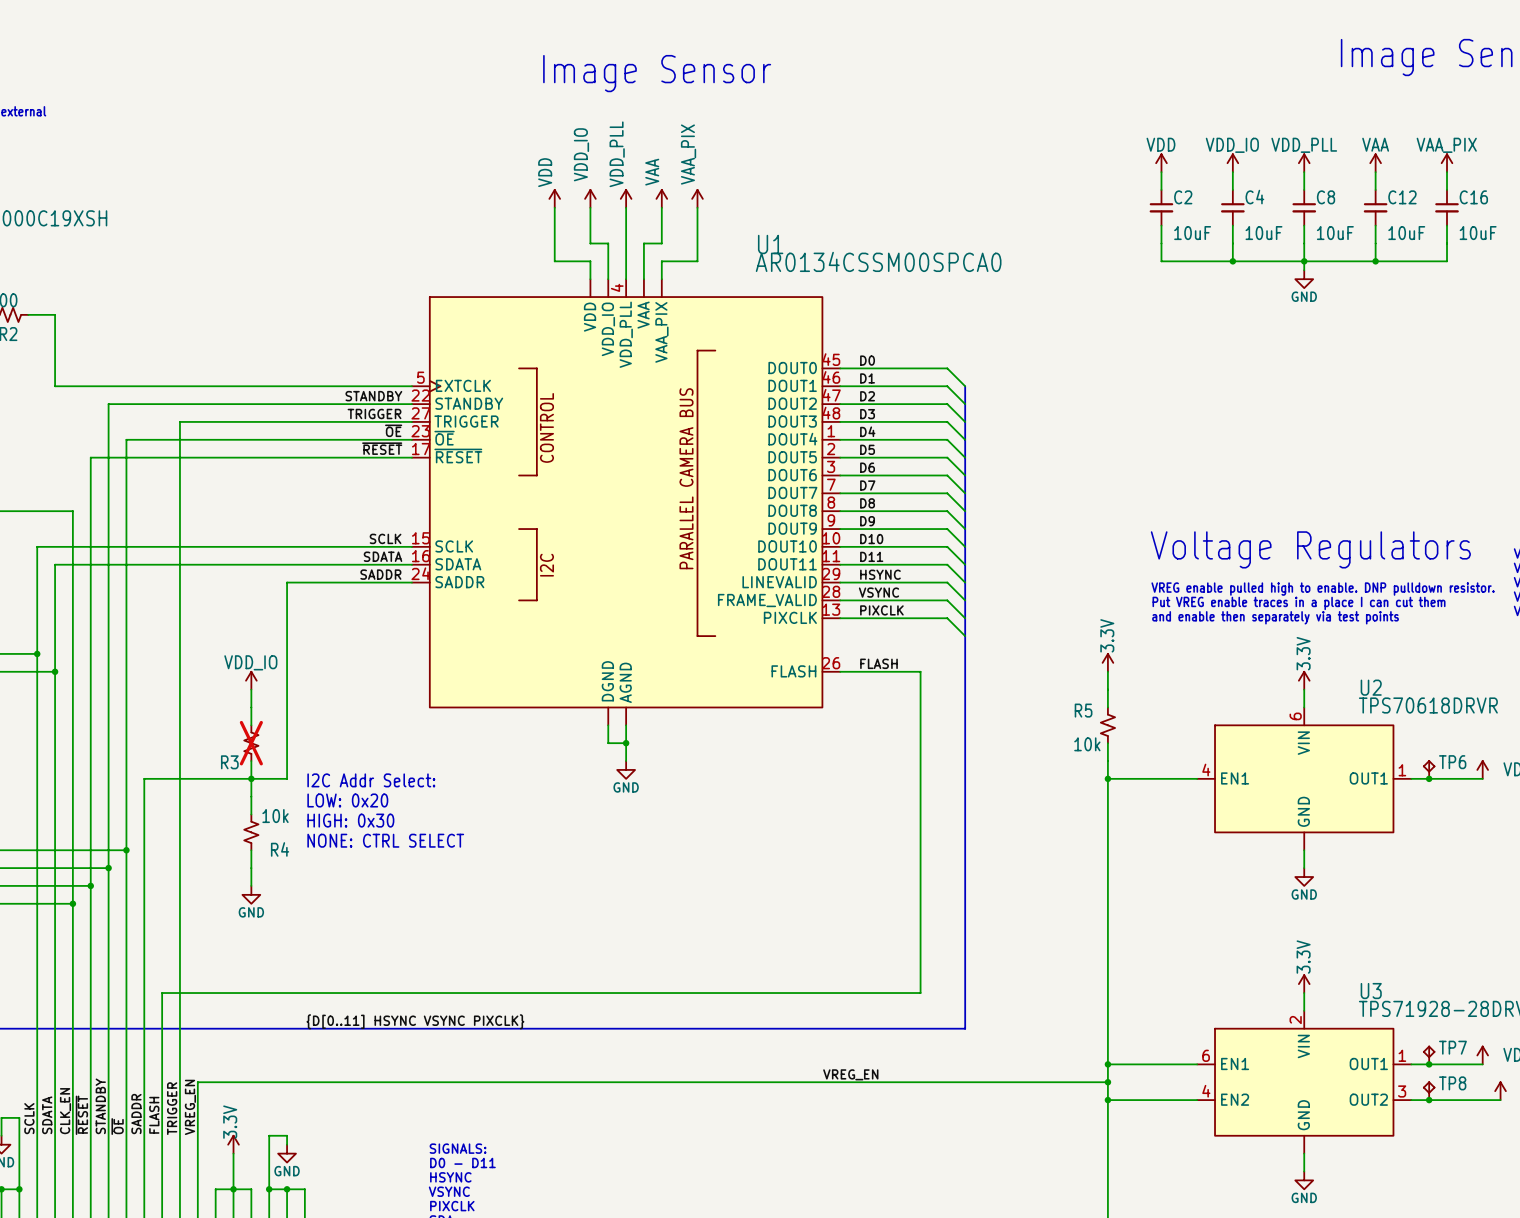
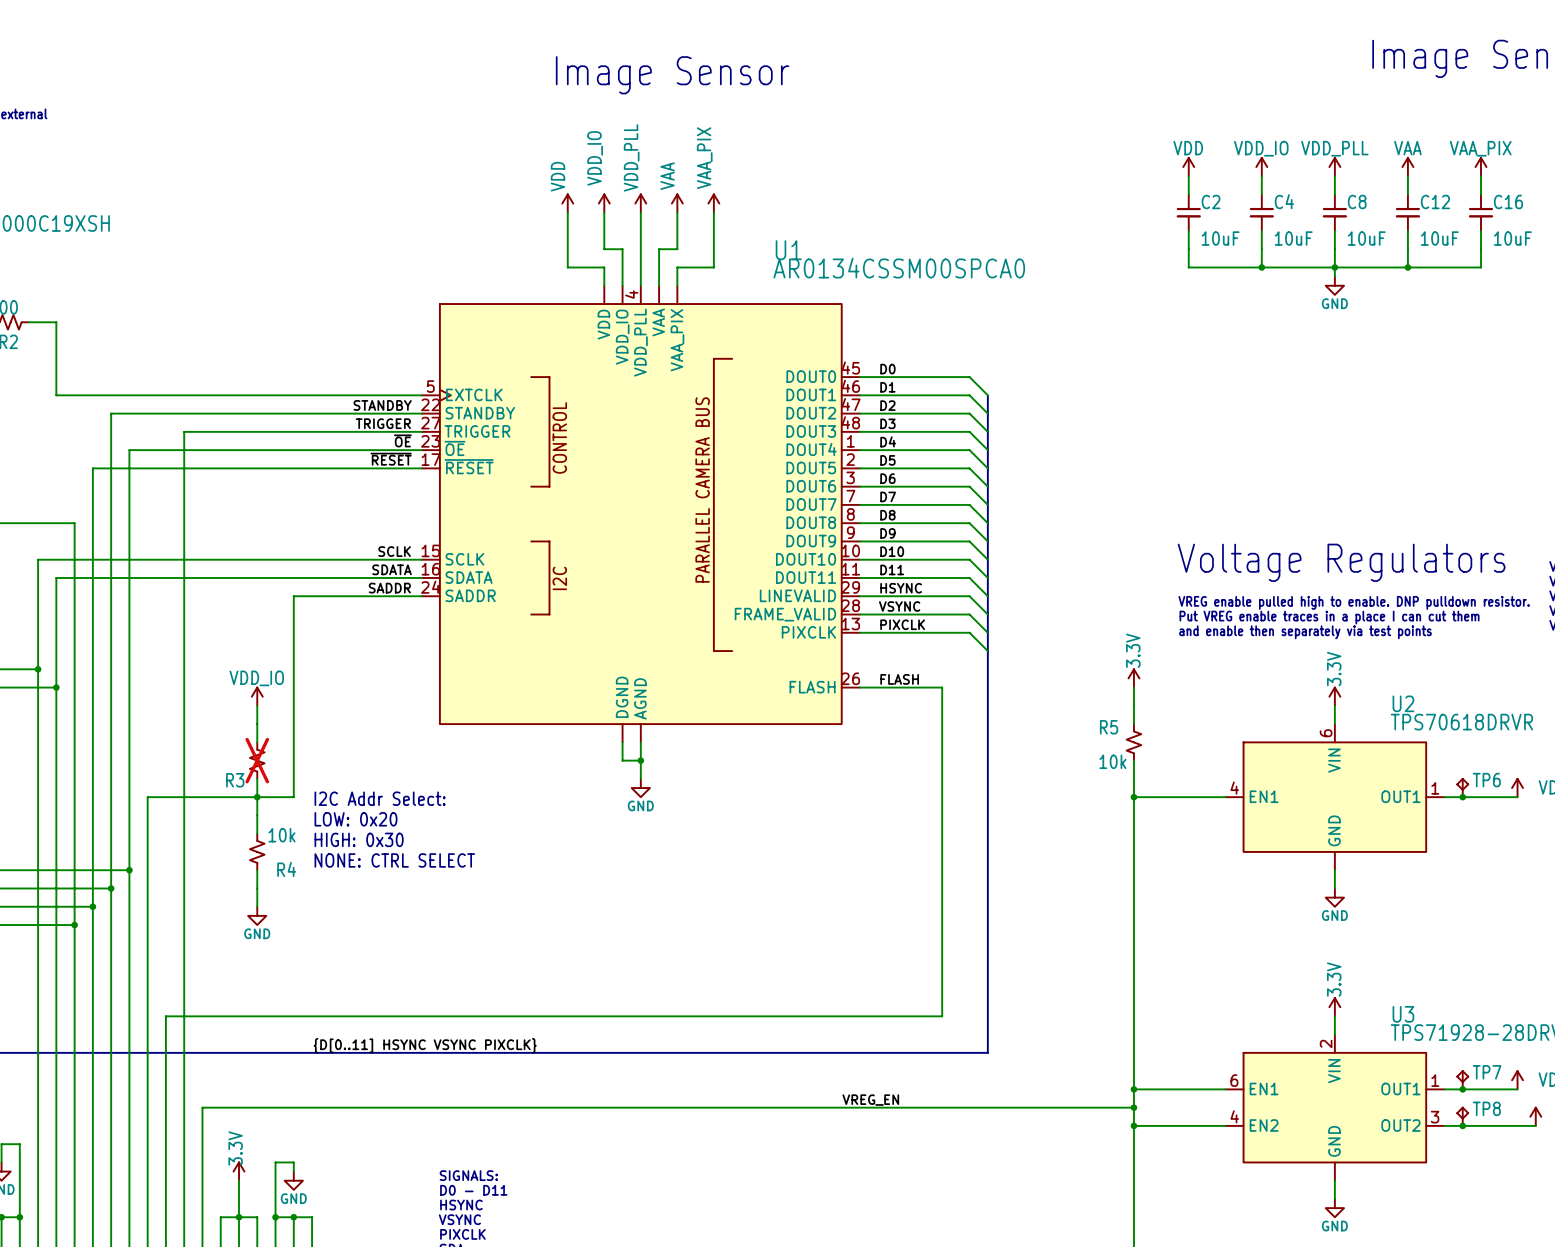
label: STANDBY (100, 1106) -> none
label: VREG_EN (190, 1107) -> none
label: TRIGGER (172, 1108) -> none
label: CLK_EN (65, 1111) -> none
label: SADDR (136, 1114) -> none
label: SDATA (47, 1115) -> none
label: ~{RESET} (81, 1115) -> none
label: FLASH (154, 1115) -> none
label: SCLK (29, 1118) -> none
label: ~{OE} (117, 1126) -> none

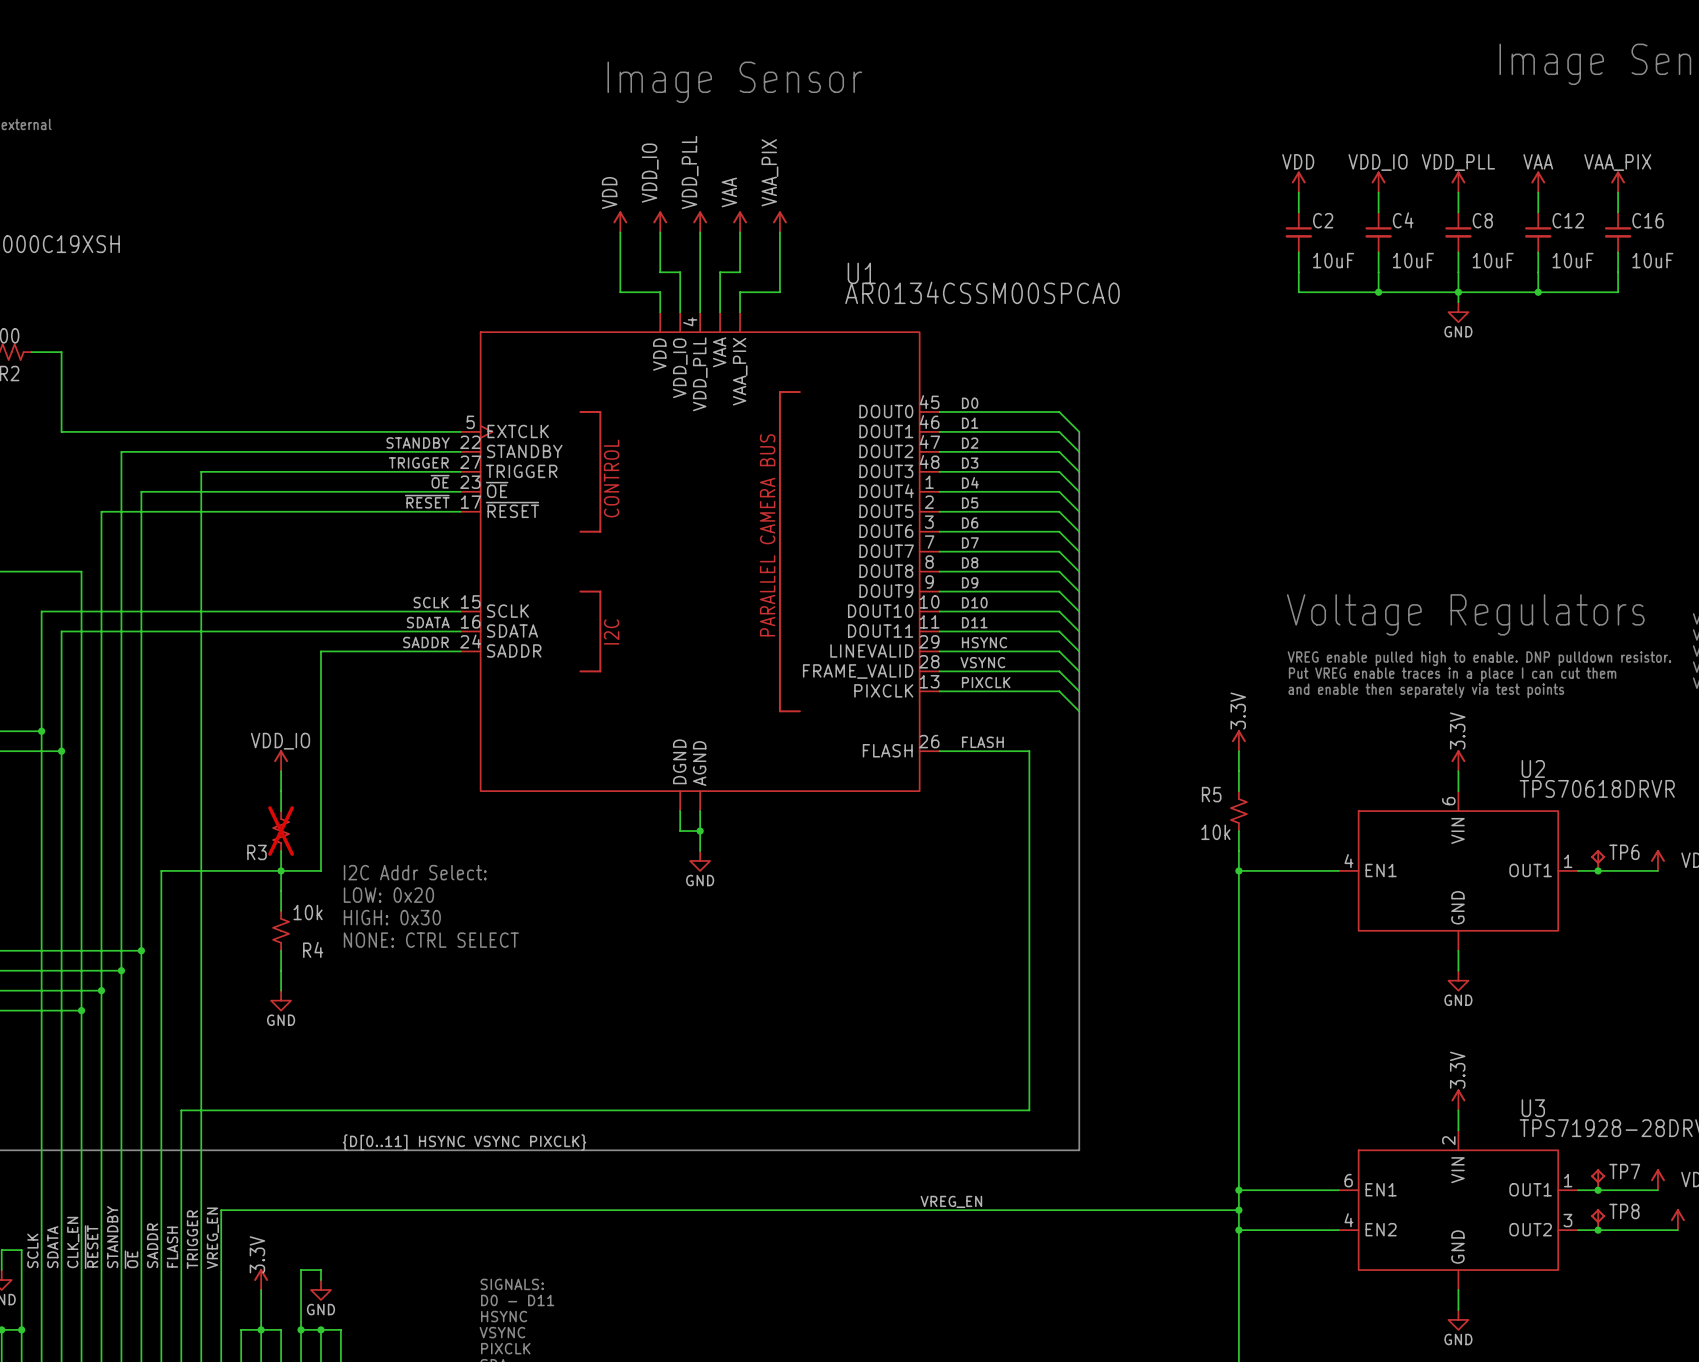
label: none -> STANDBY (112, 1237)
label: none -> VREG_EN (212, 1238)
label: none -> TRIGGER (192, 1239)
label: none -> CLK_EN (73, 1242)
label: none -> SADDR (152, 1245)
label: none -> SDATA (52, 1247)
label: none -> ~{RESET} (91, 1247)
label: none -> FLASH (172, 1247)
label: none -> SCLK (32, 1250)
label: none -> ~{OE} (131, 1259)

